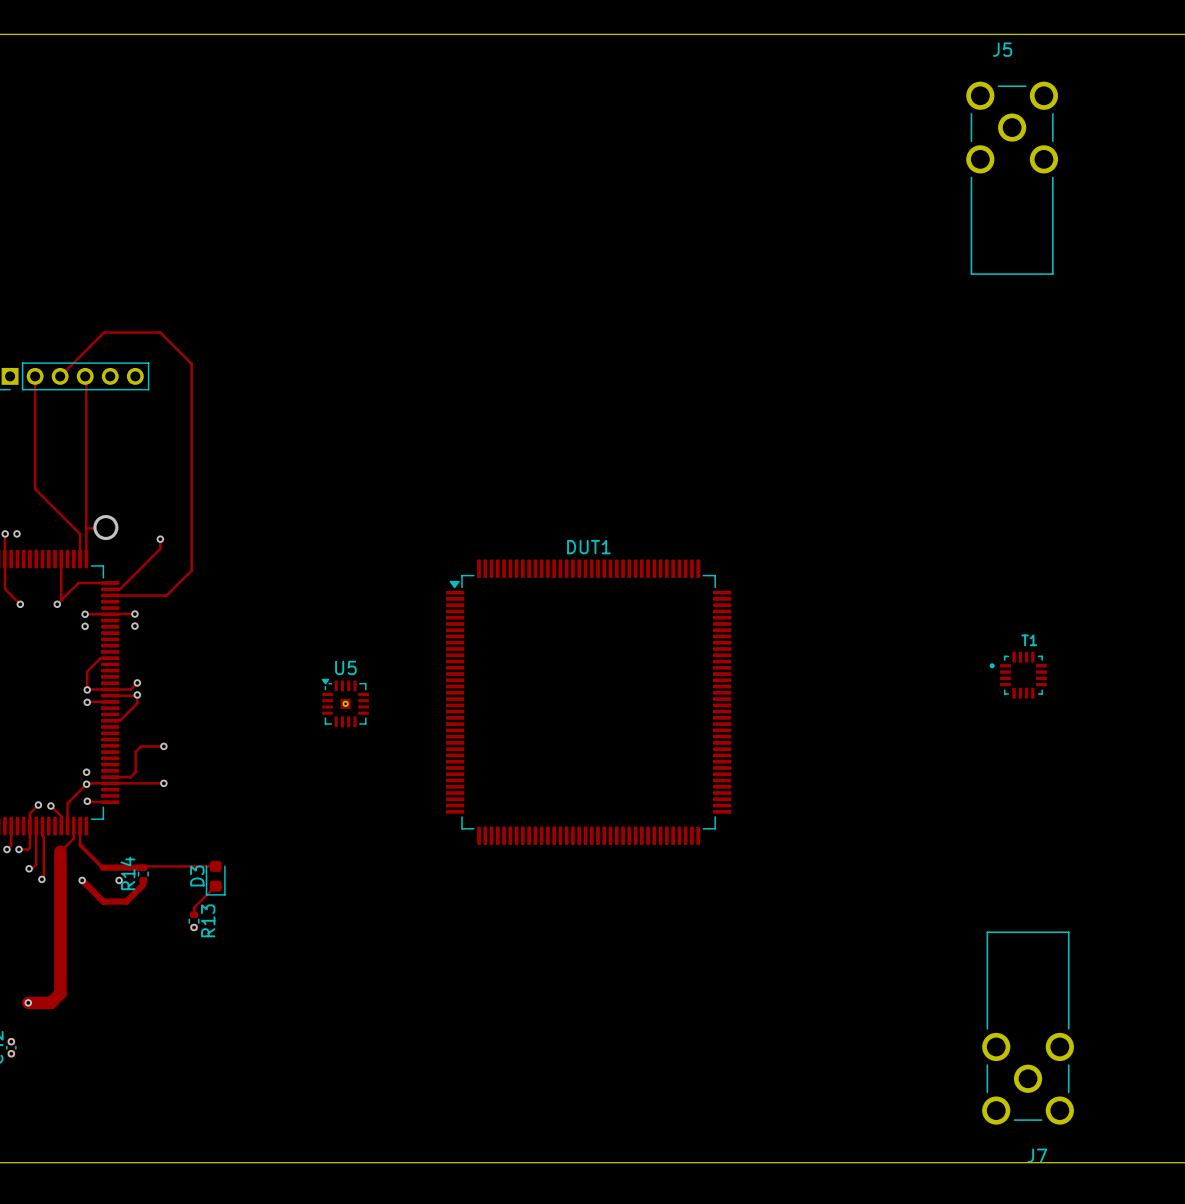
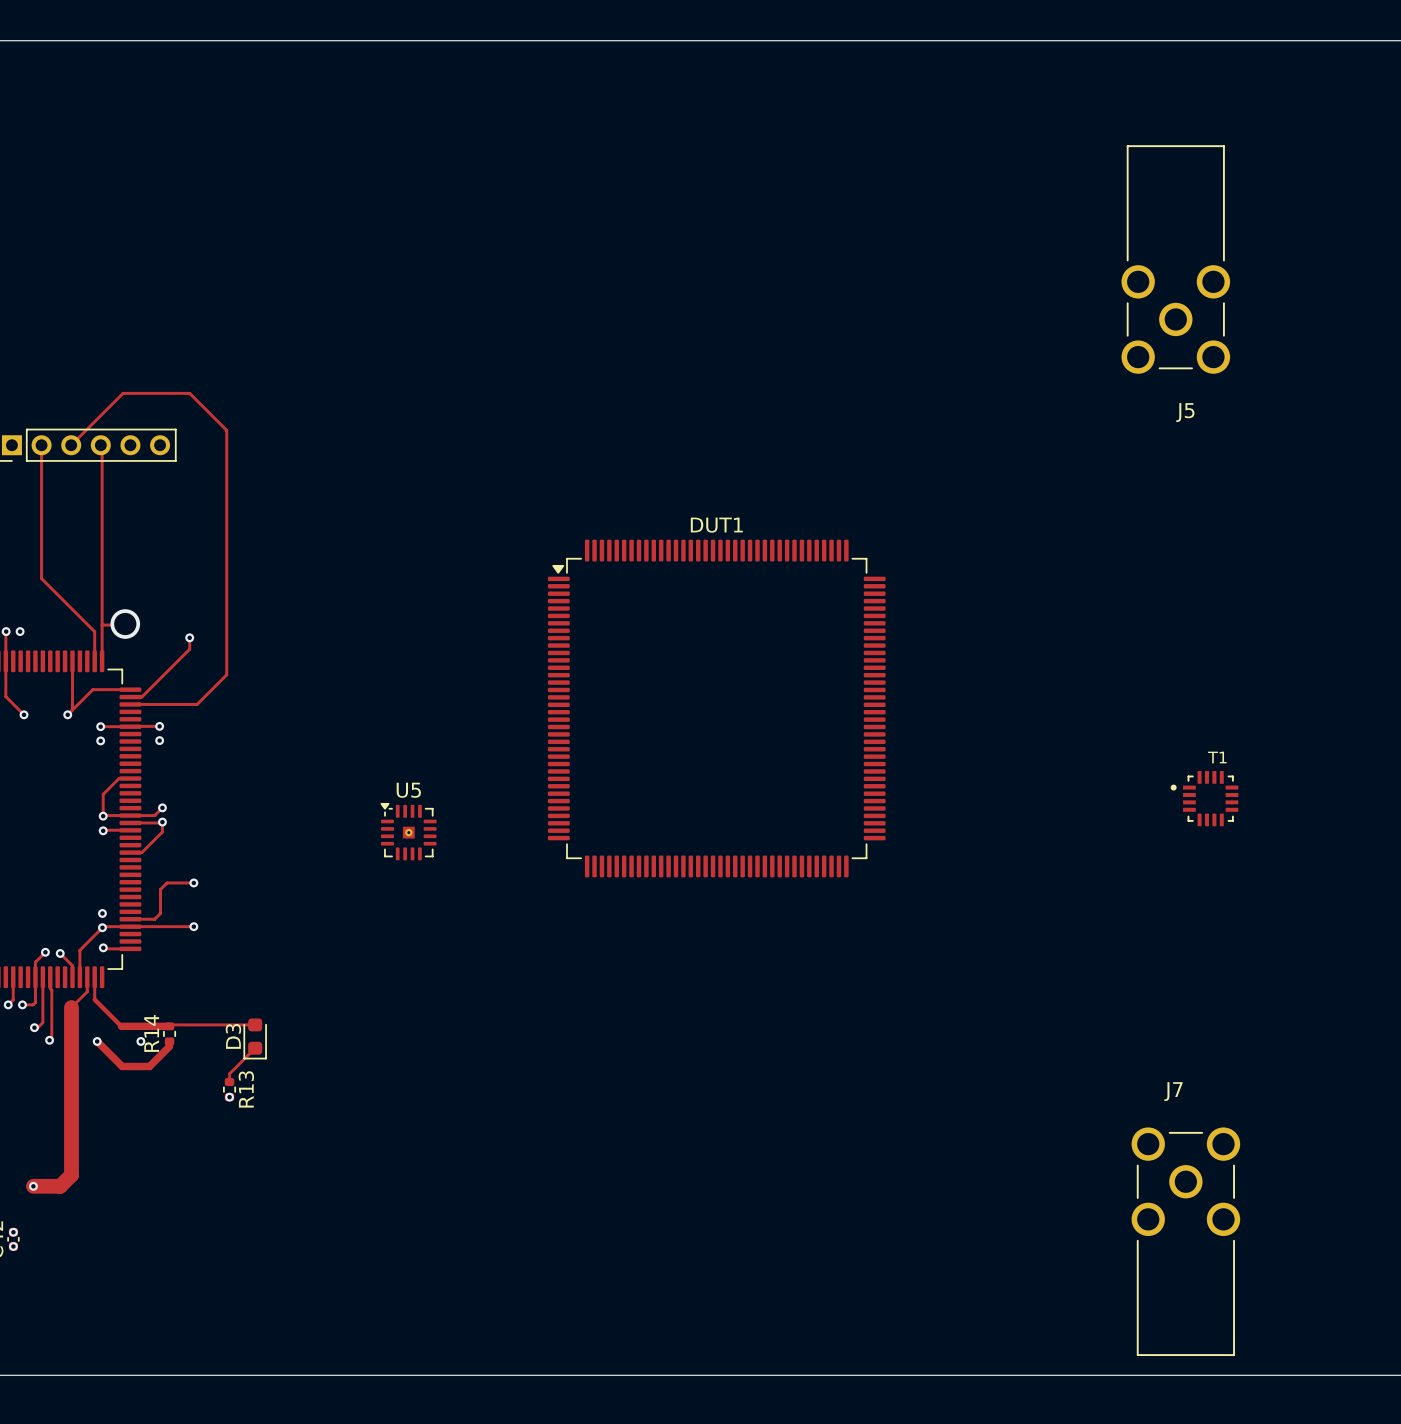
J5 rotation: 0° (1012, 178) -> 180° (1175, 259)
DUT1 position: (588, 702) -> (716, 708)
J7 rotation: 0° (1028, 1028) -> 180° (1185, 1241)

